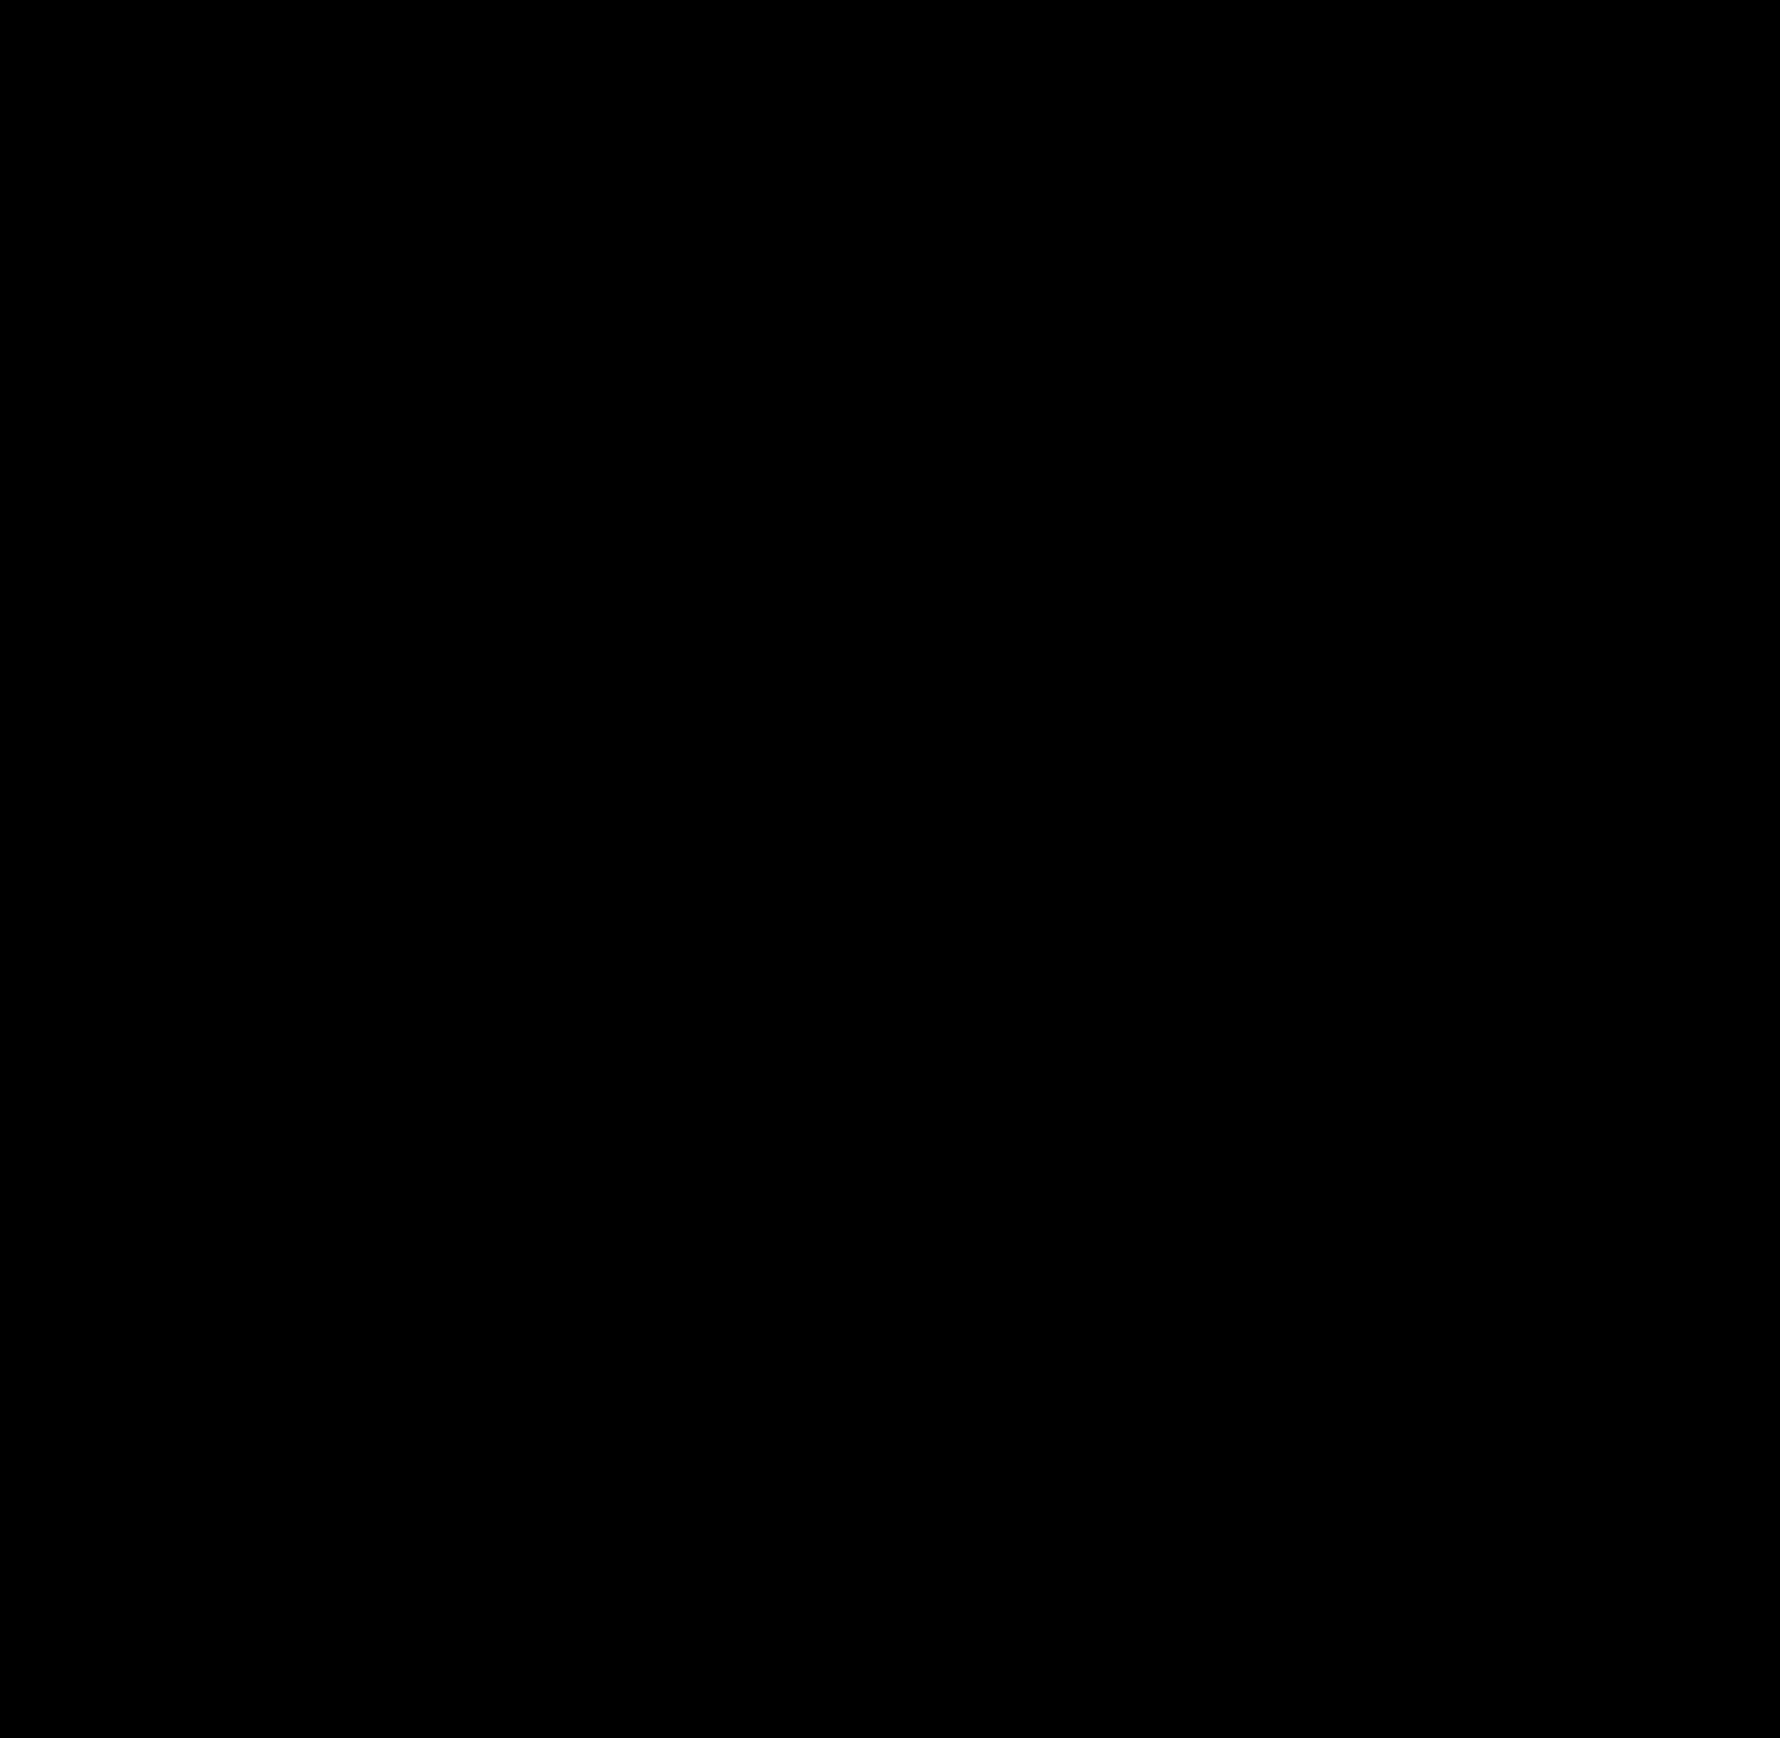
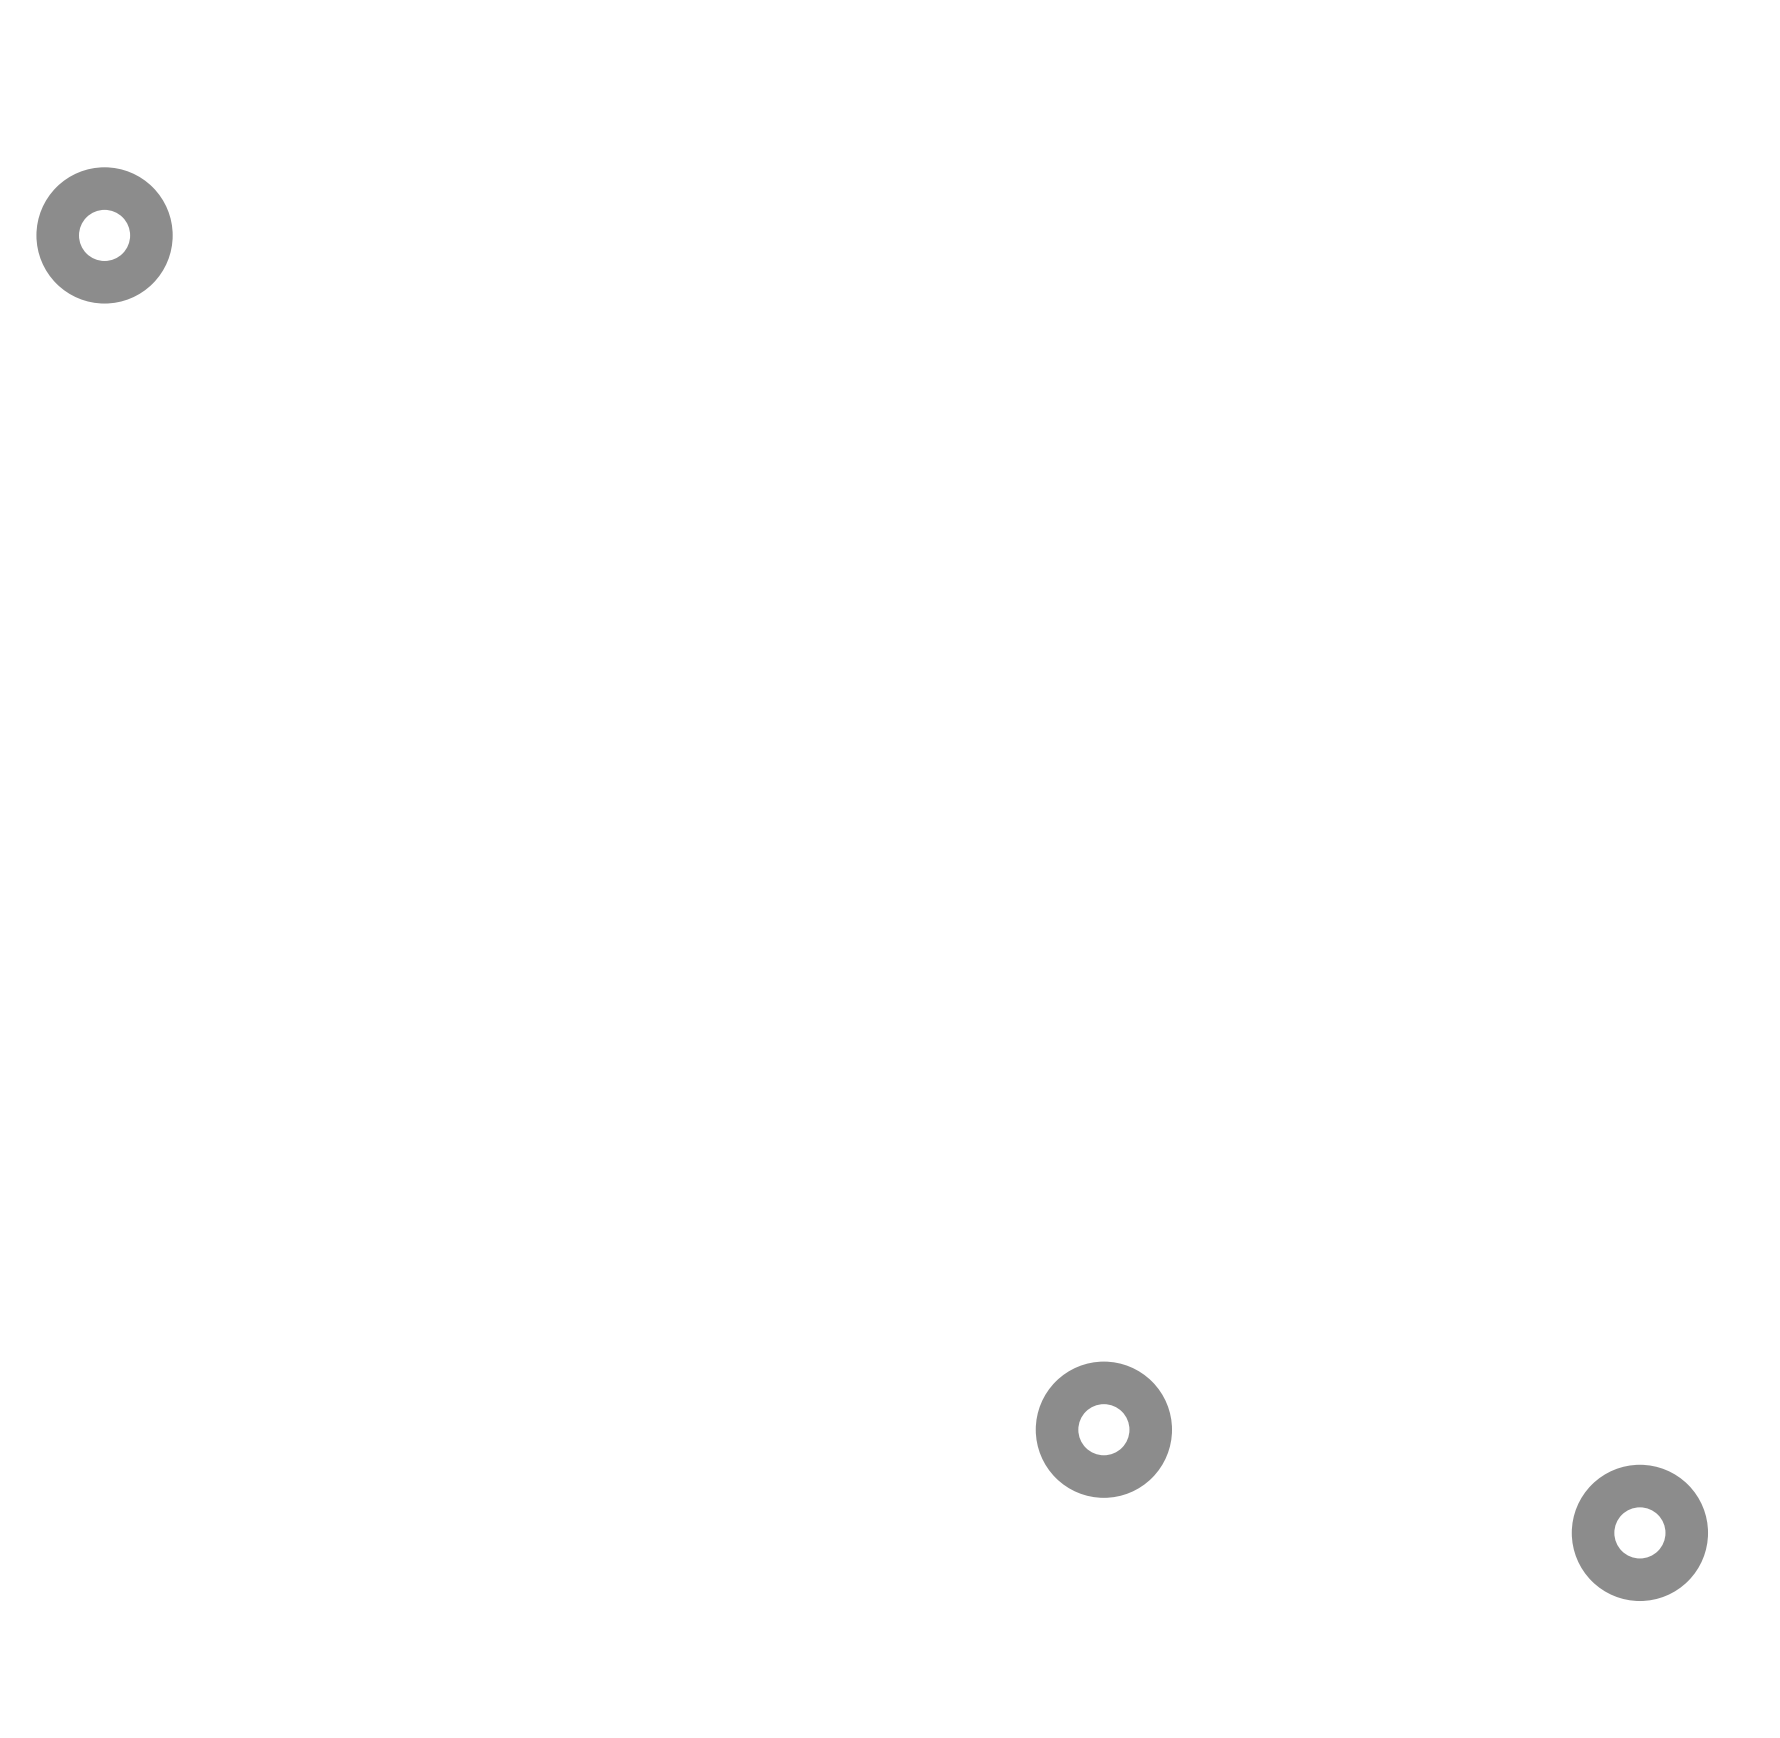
part: none -> (104, 235)
part: none -> (1103, 1429)
part: none -> (1639, 1532)

